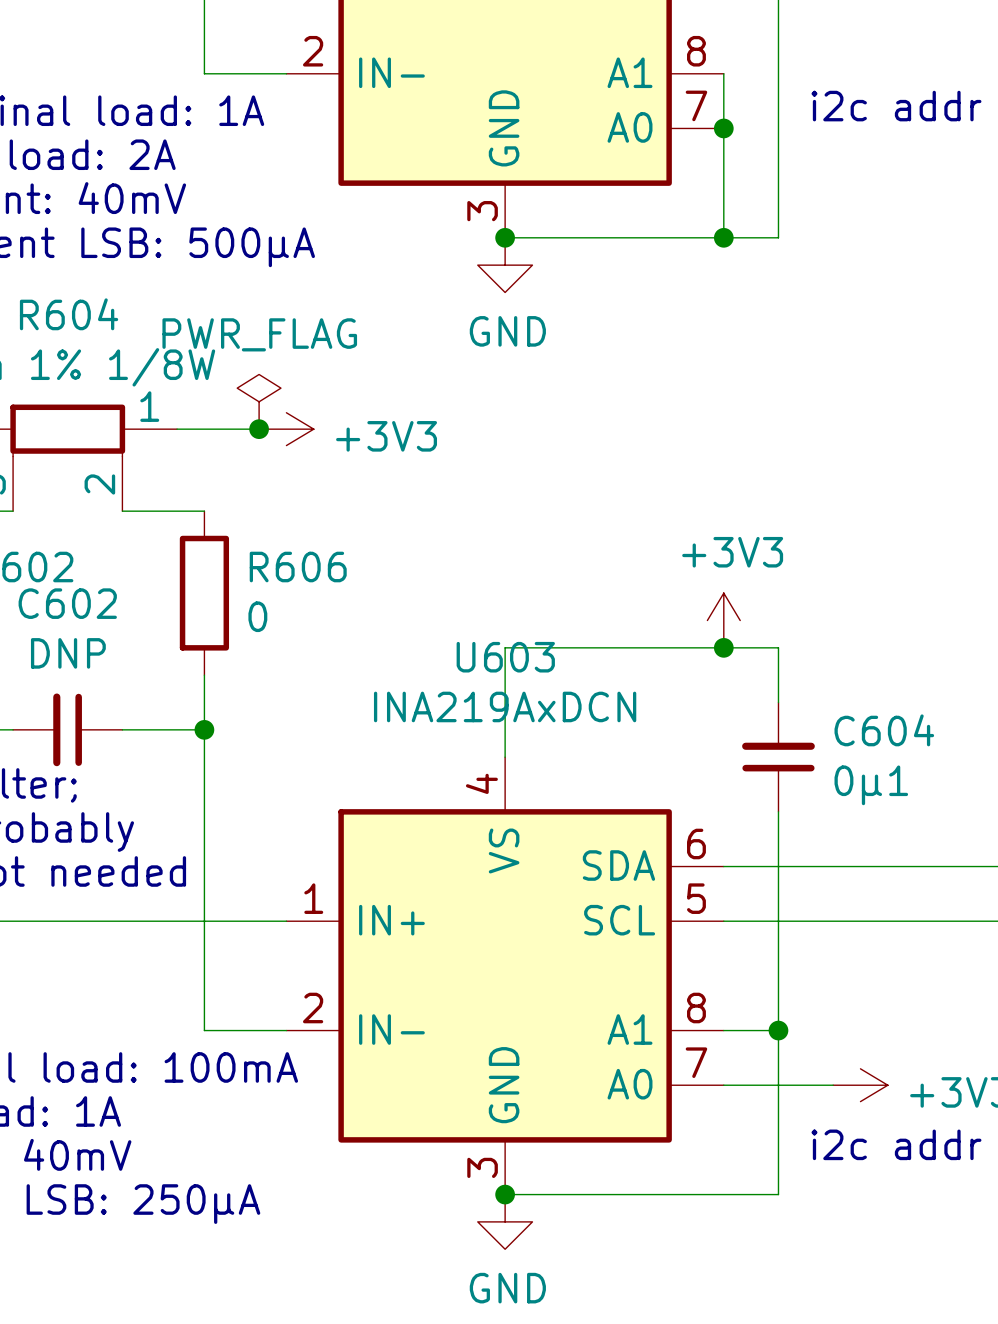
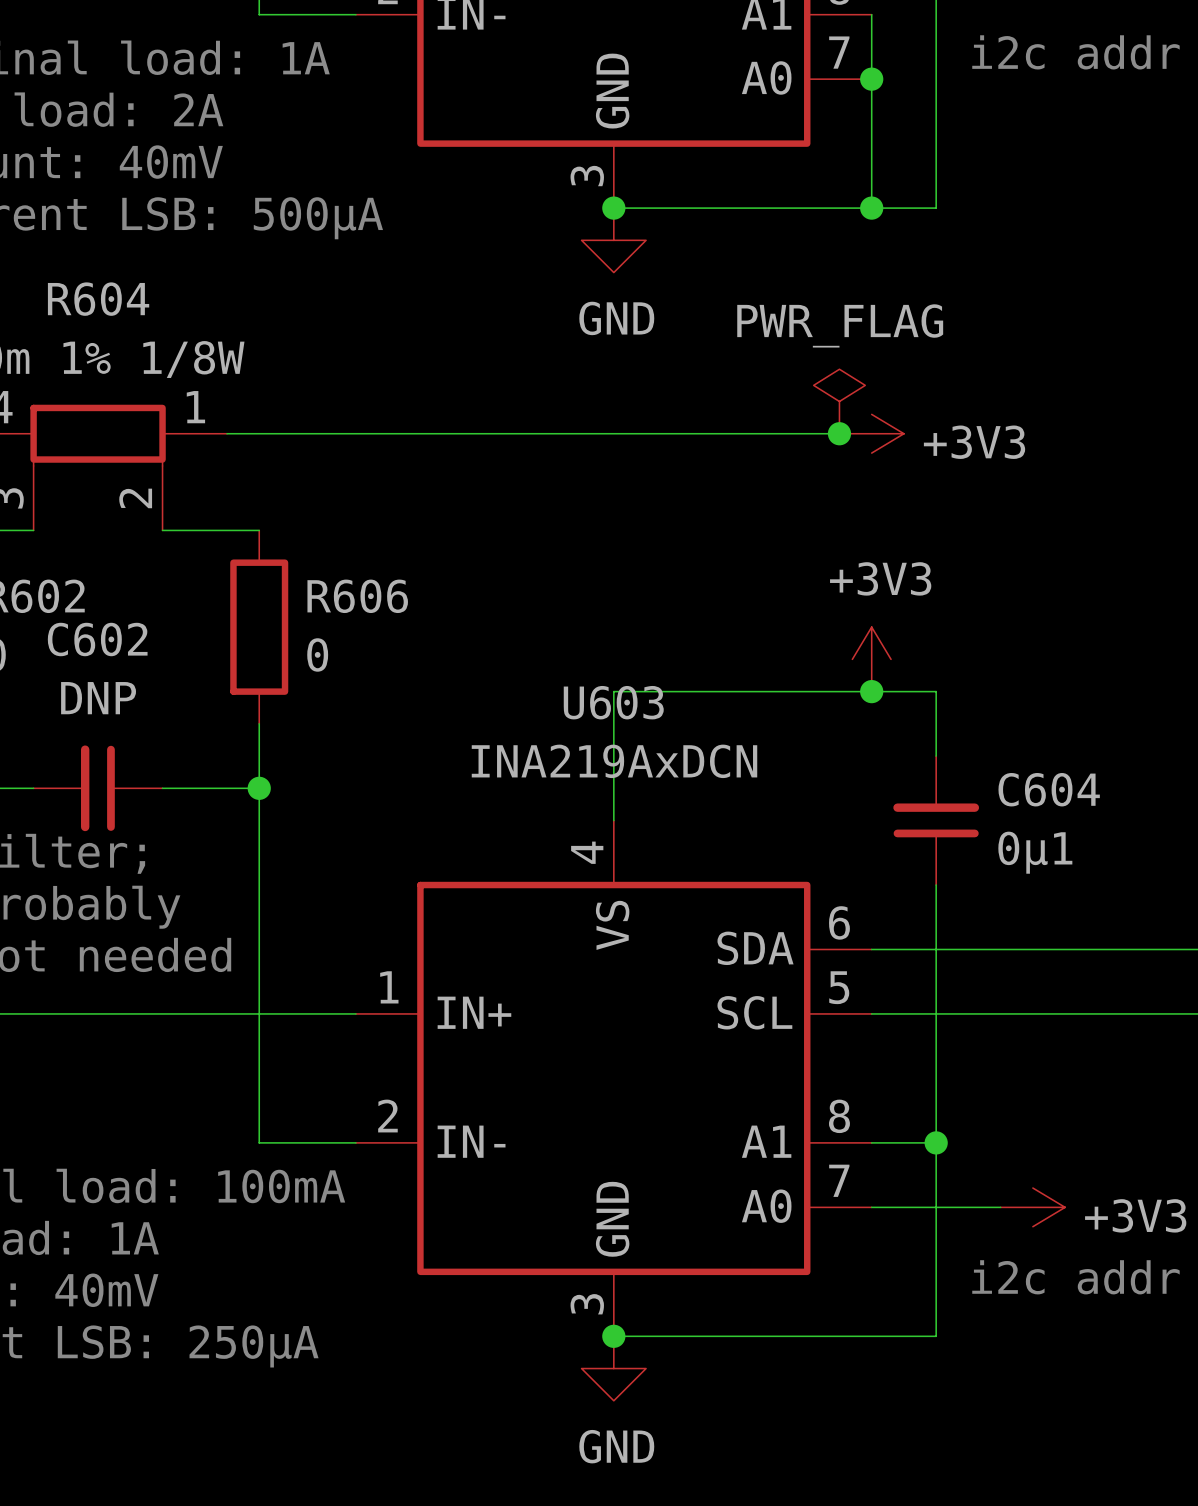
power symbol position: PWR_FLAG (259, 401) -> PWR_FLAG (839, 401)
wire: none -> (323, 433) (839, 433)
junction: (259, 429) -> none
power symbol position: +3V3 (286, 429) -> +3V3 (871, 433)
junction: none -> (839, 433)

